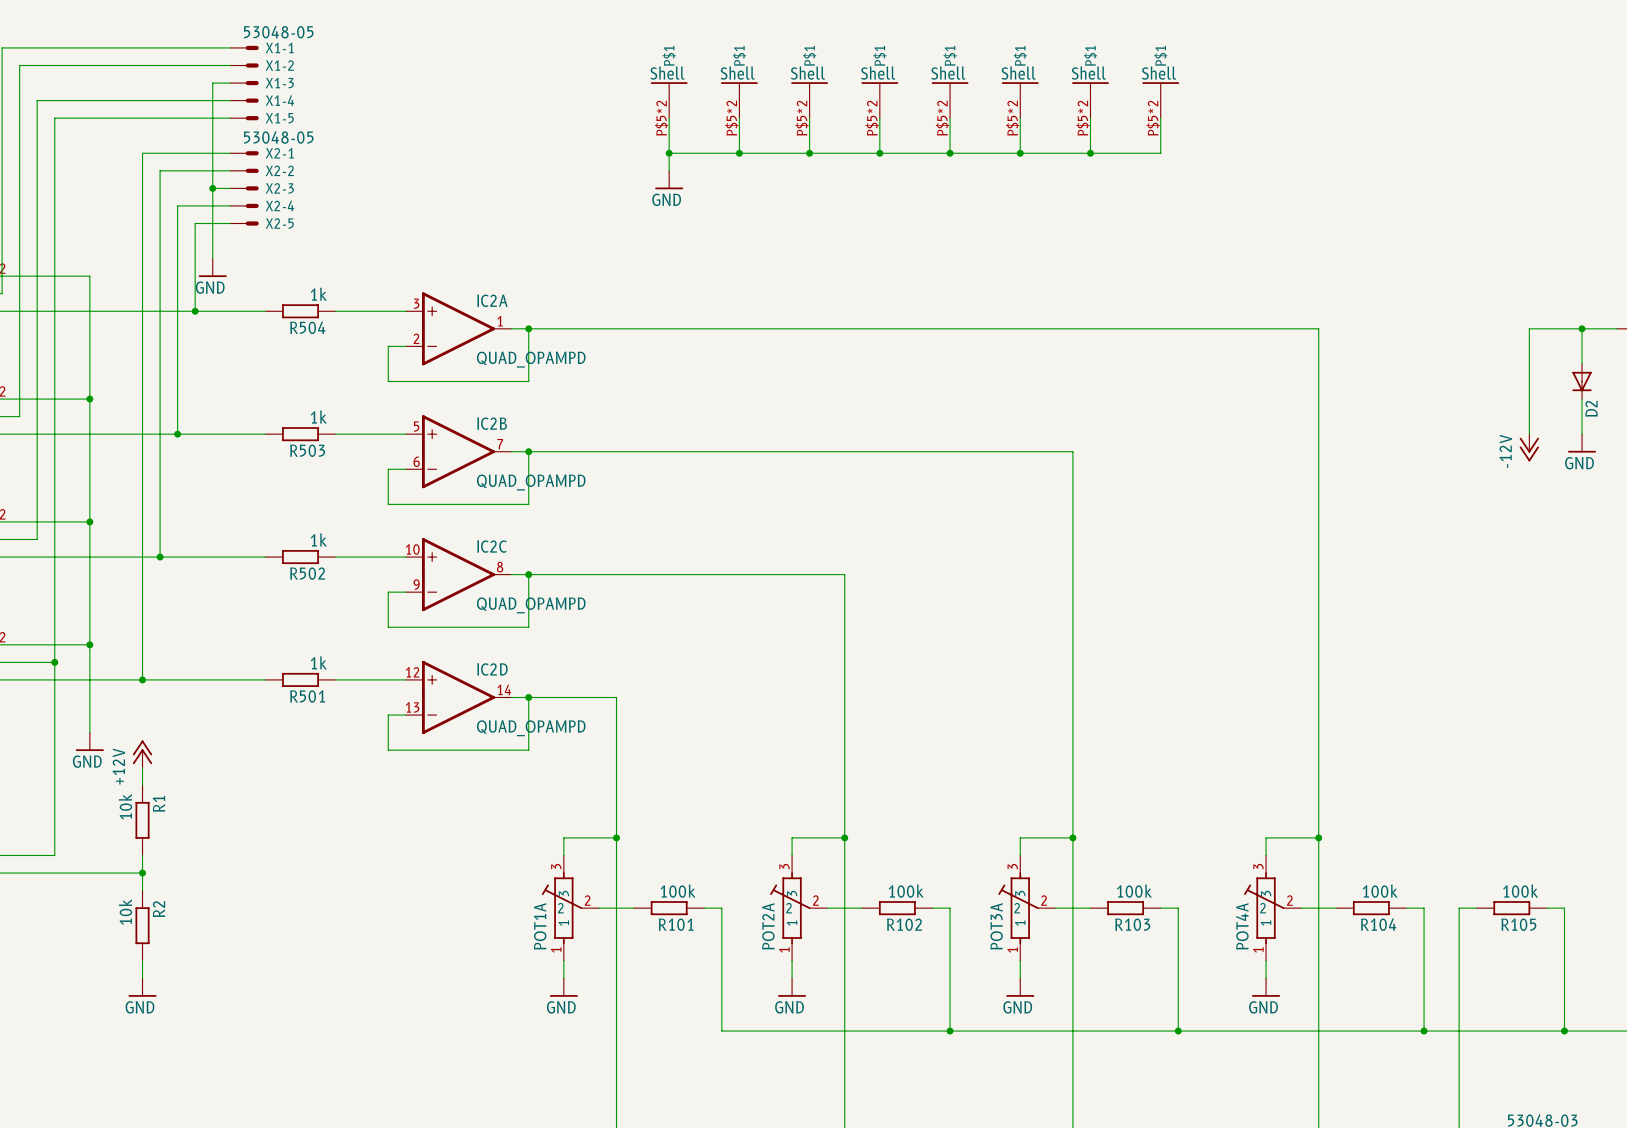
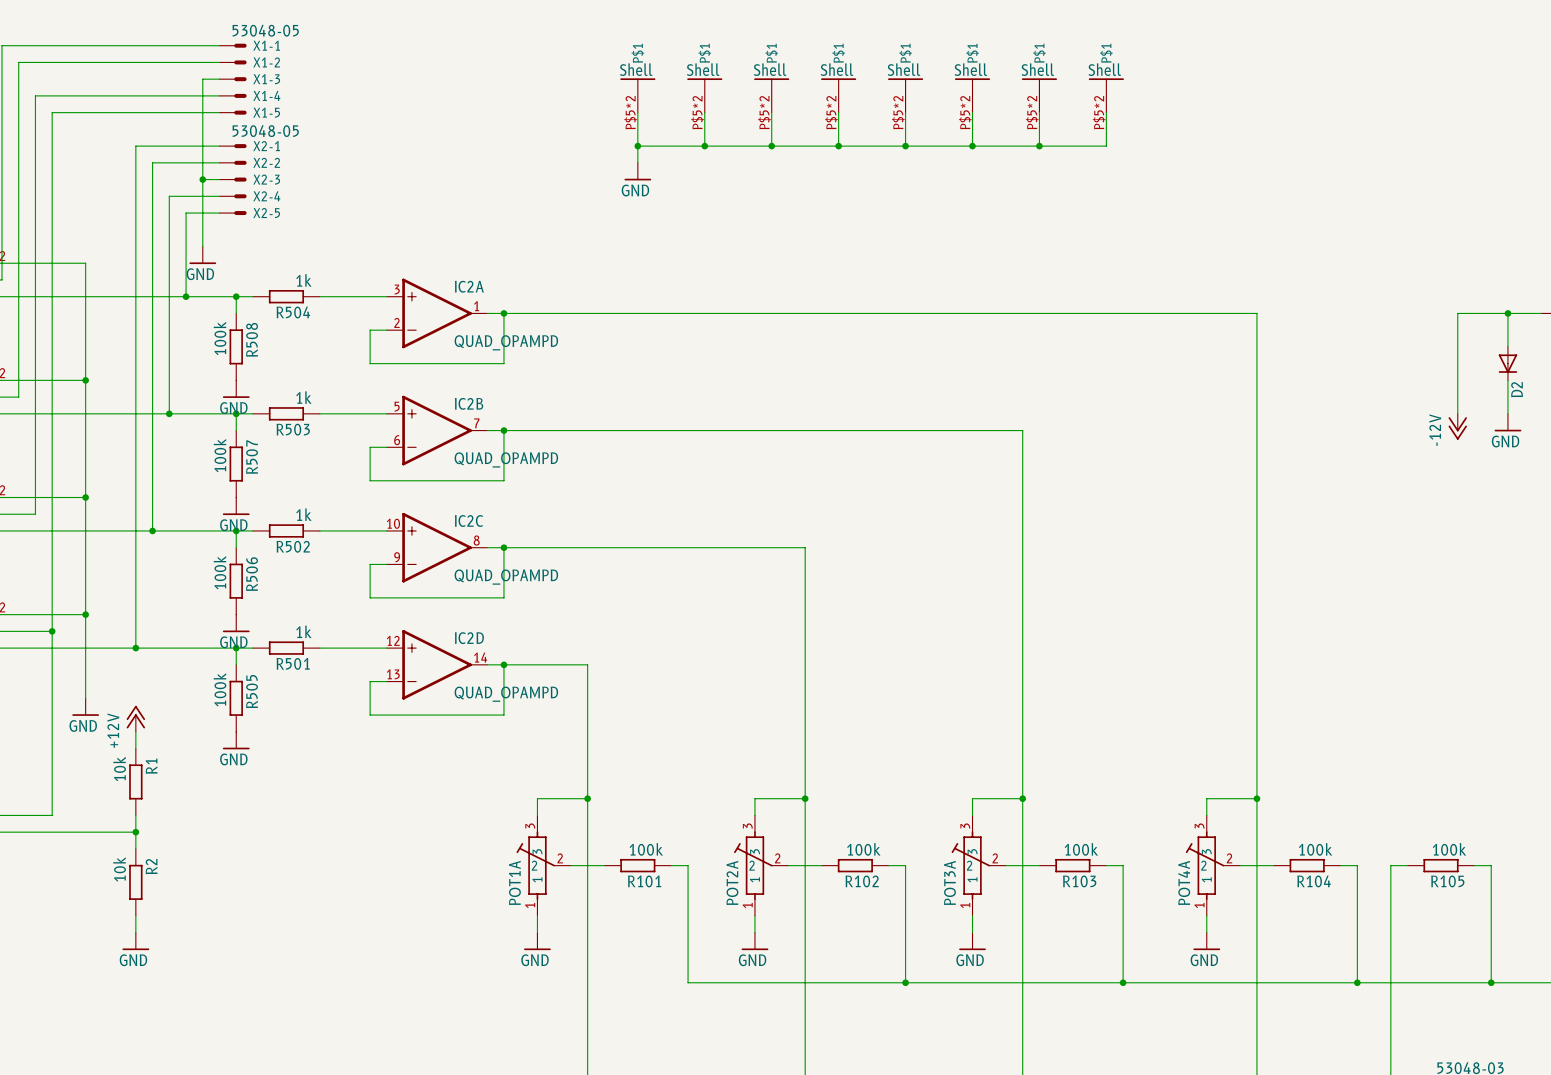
wire: none -> (236, 296) (236, 313)
junction: none -> (236, 296)
R508: none -> 100k (236, 346)
power symbol: none -> GND (236, 389)
wire: none -> (236, 413) (236, 430)
junction: none -> (236, 413)
R507: none -> 100k (236, 464)
power symbol: none -> GND (236, 506)
wire: none -> (236, 530) (236, 547)
junction: none -> (236, 530)
R506: none -> 100k (236, 581)
power symbol: none -> GND (236, 623)
wire: none -> (236, 648) (236, 664)
junction: none -> (236, 648)
R505: none -> 100k (236, 698)
power symbol: none -> GND (236, 740)

